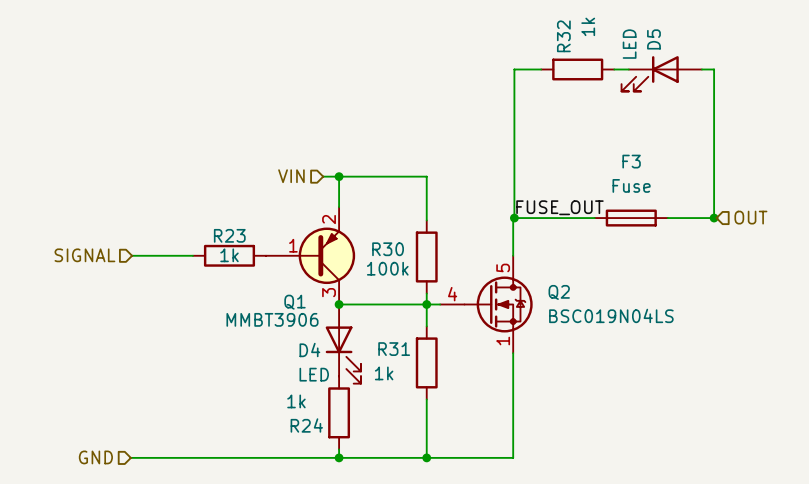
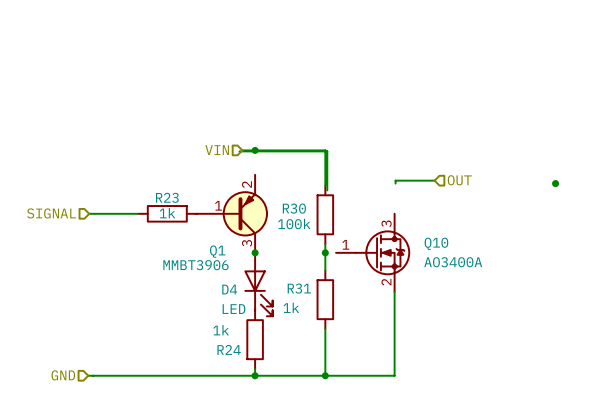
wire: (541, 69) (514, 69) (514, 214) -> (434, 180) (395, 180)
R32: 1k (577, 69) -> none
wire: (614, 69) (628, 69) -> none
wire: (701, 69) (714, 69) (714, 218) -> none
D5: LED (661, 73) -> none
wire: (339, 176) (339, 207) -> none
wire: none -> (239, 151) (327, 151) (327, 190)
label: FUSE_OUT (559, 207) -> none
hierarchical label position: OUT (750, 217) -> OUT (459, 180)
junction: (514, 218) -> none
wire: (594, 218) (513, 218) (513, 255) -> none
F3: Fuse (631, 218) -> none
wire: (667, 218) (716, 218) -> none
Q2 pin number: 5 (503, 267) -> 3 (386, 223)
Q2 name: Q2 (559, 292) -> Q10 (436, 243)
Q2 pin number: 4 (452, 294) -> 1 (345, 244)
wire: (339, 303) (440, 304) -> none
Q2 value: BSC019N04LS (611, 315) -> AO3400A (453, 262)
Q2 pin number: 1 (503, 341) -> 2 (386, 282)

